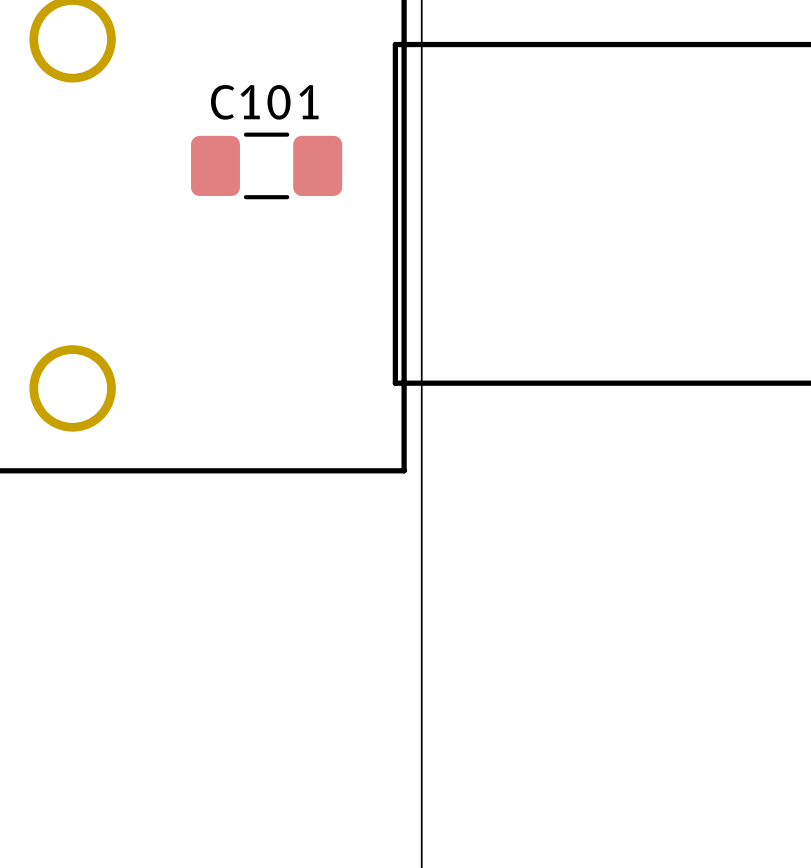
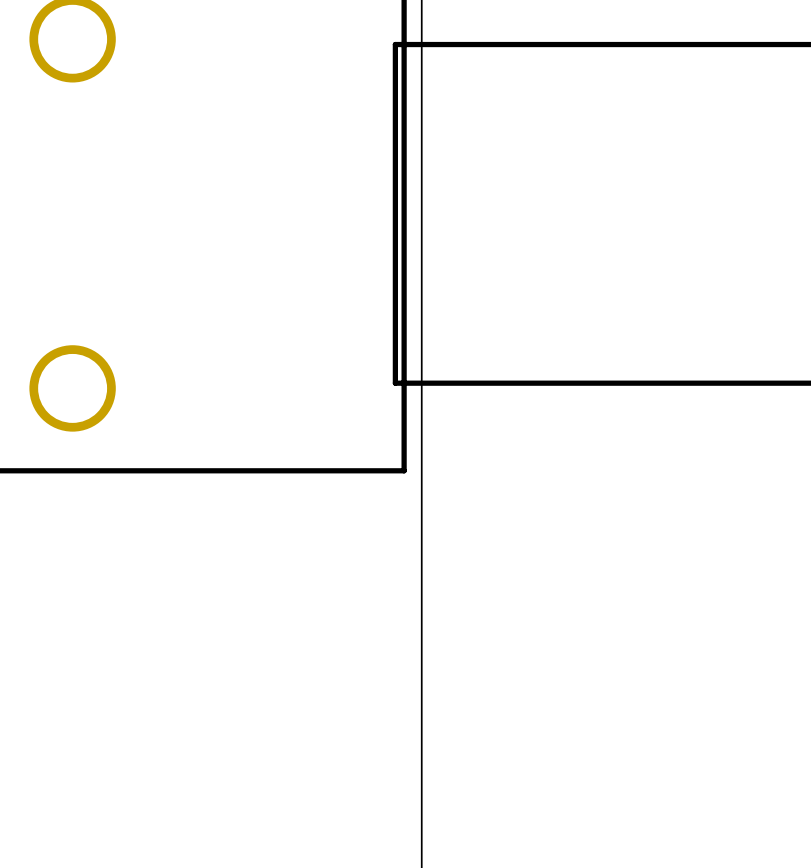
C101: (266, 165) -> none

